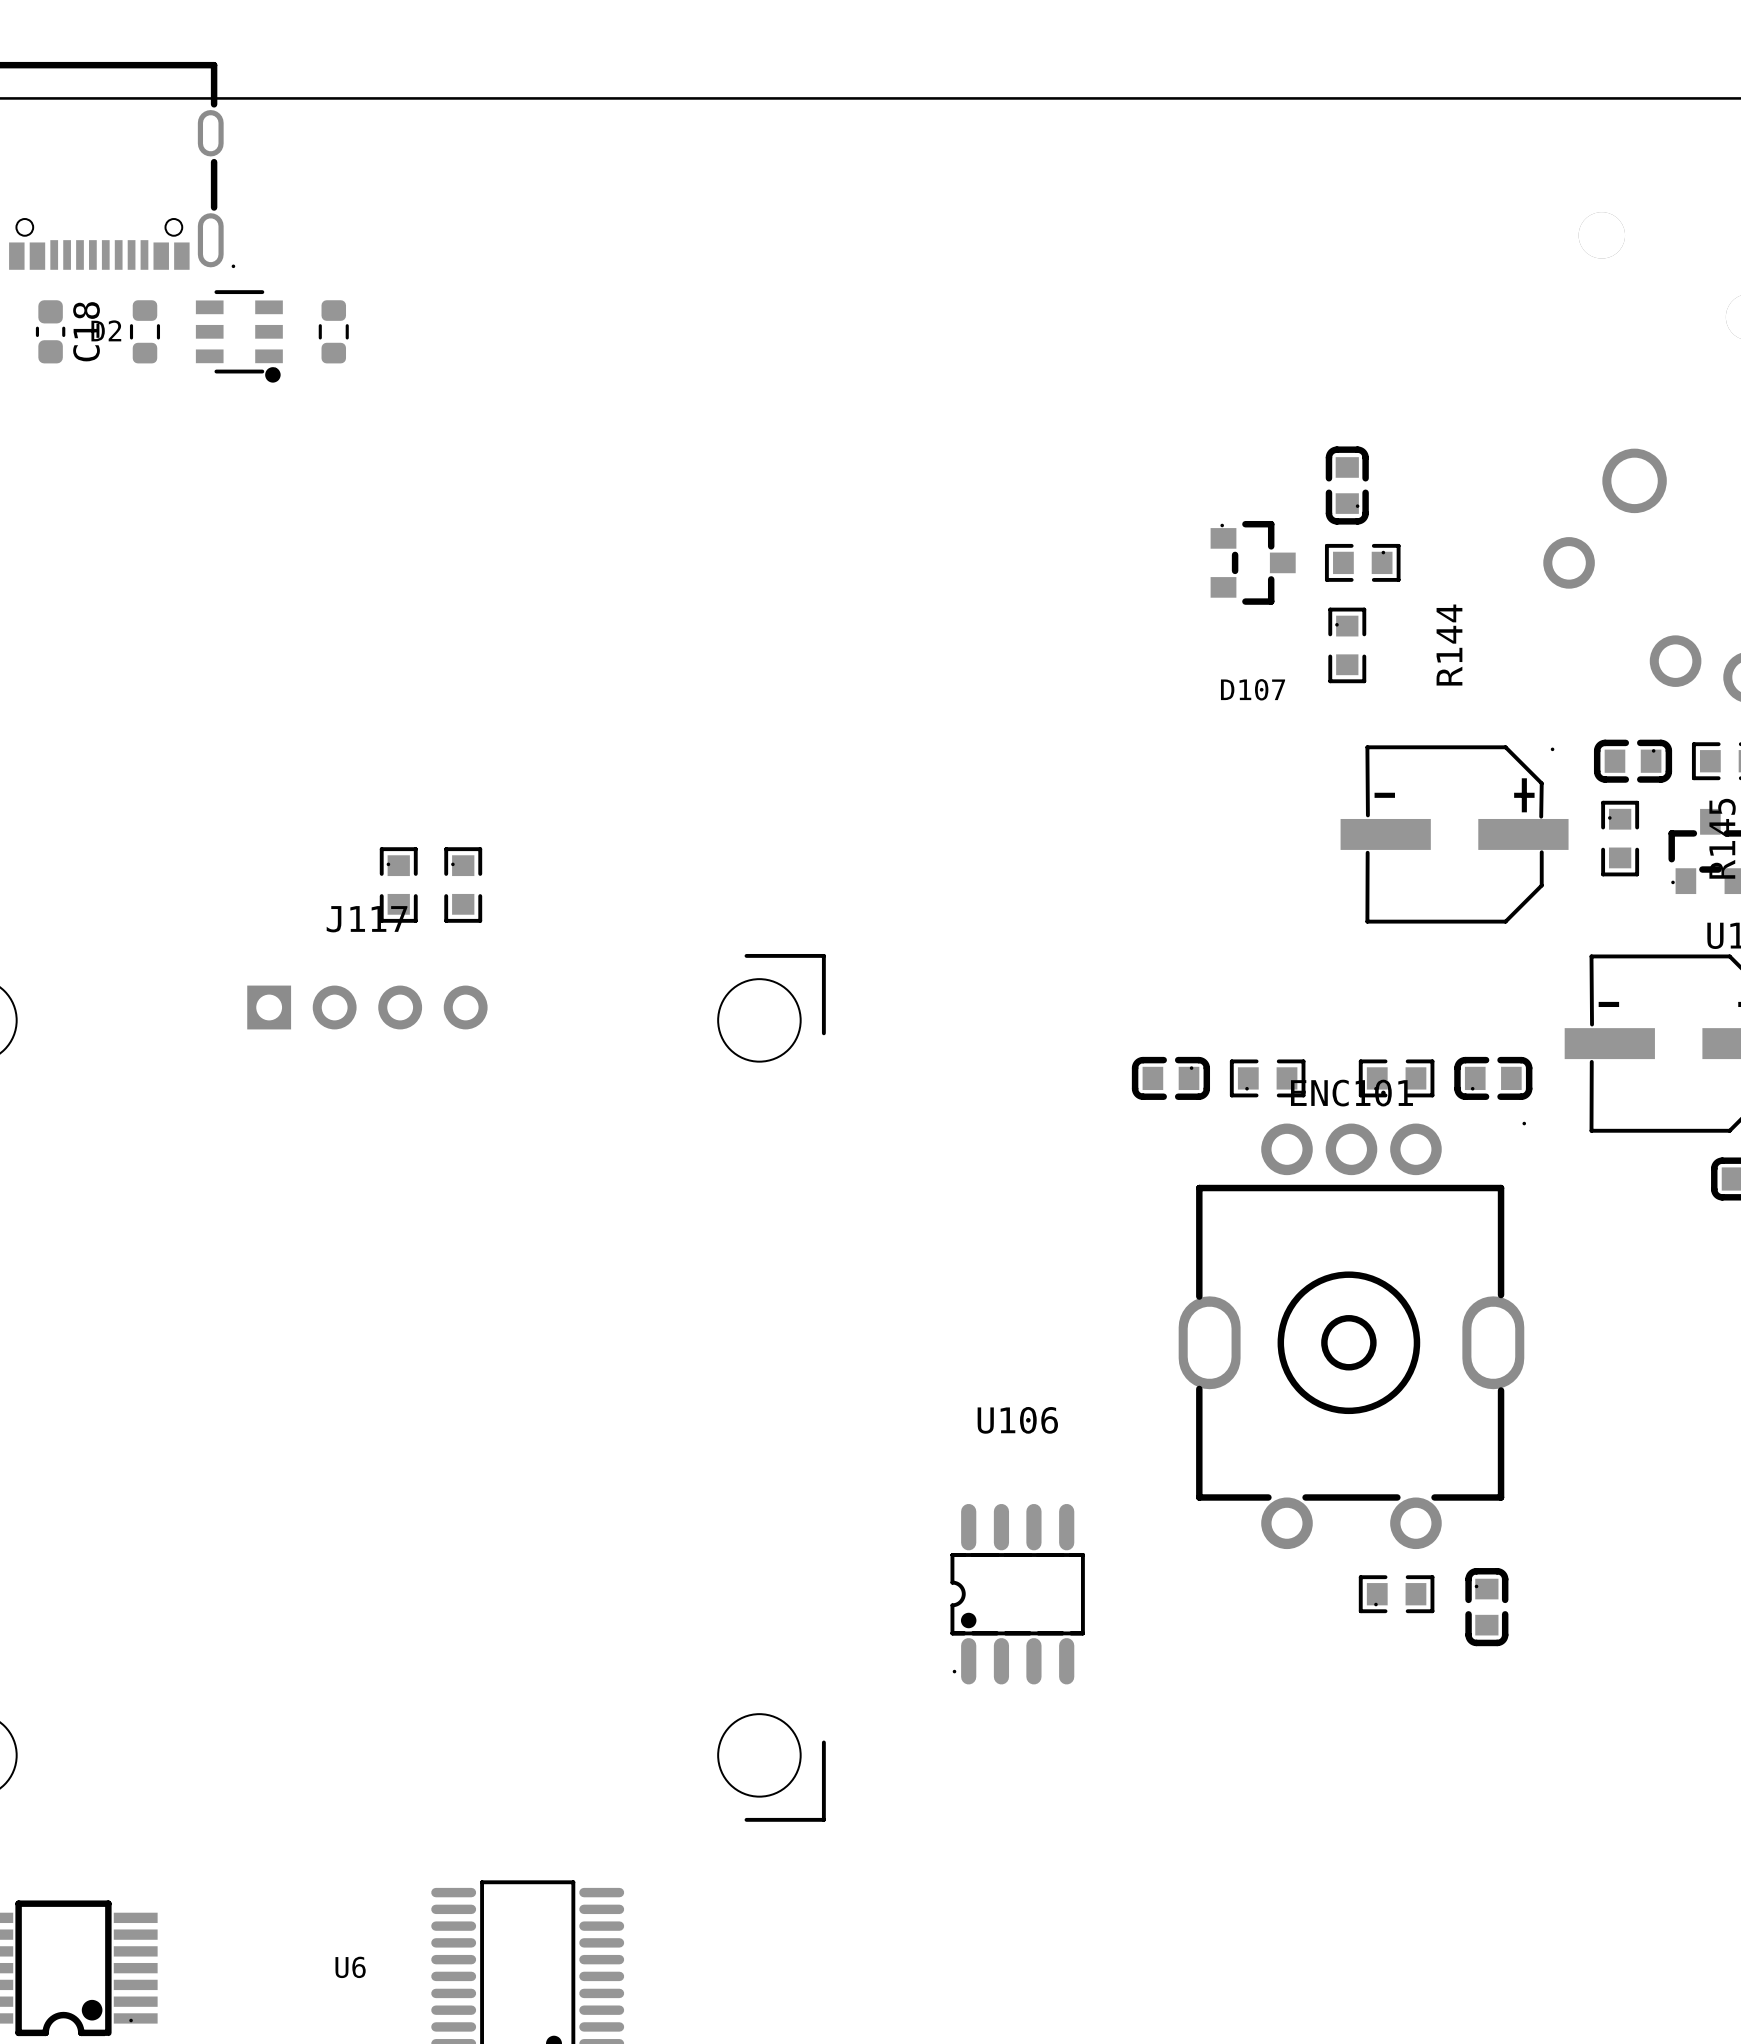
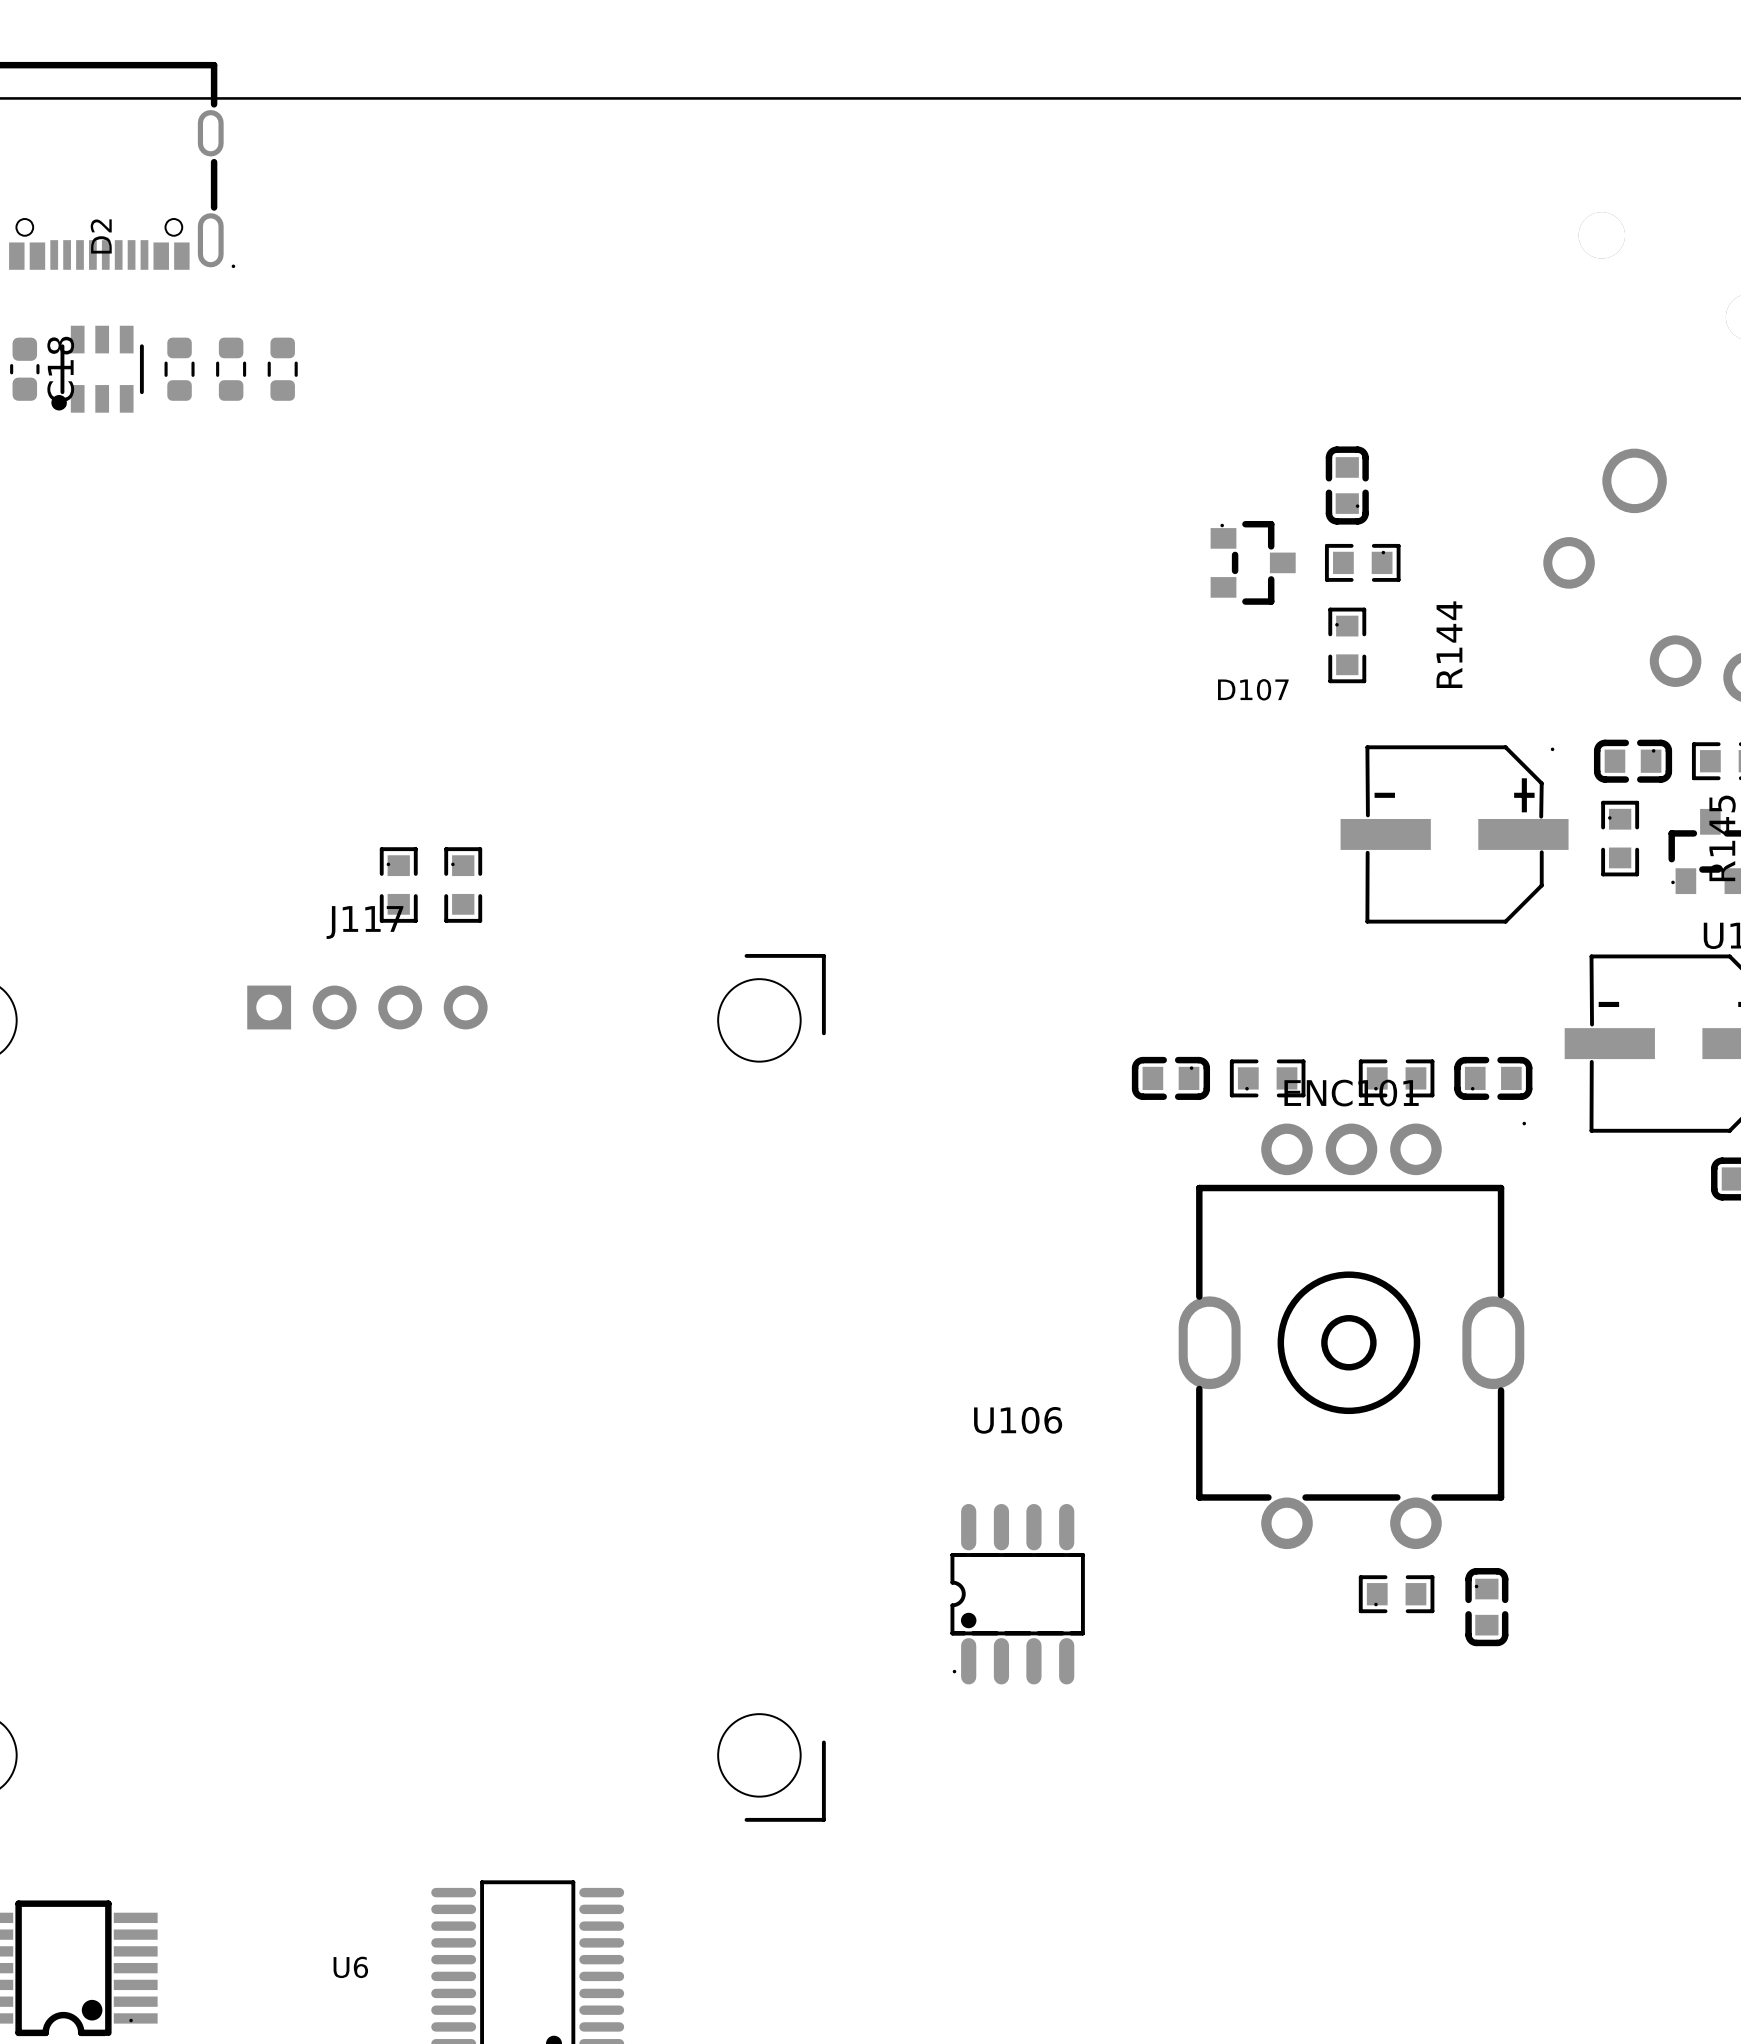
C18 position: (50, 331) -> (24, 369)
part: (144, 331) -> none
part: (333, 331) -> none
D2 rotation: 0° (239, 336) -> 90° clockwise (97, 369)
D2 position: (239, 336) -> (97, 369)
part: none -> (179, 369)
part: none -> (231, 369)
part: none -> (282, 369)

